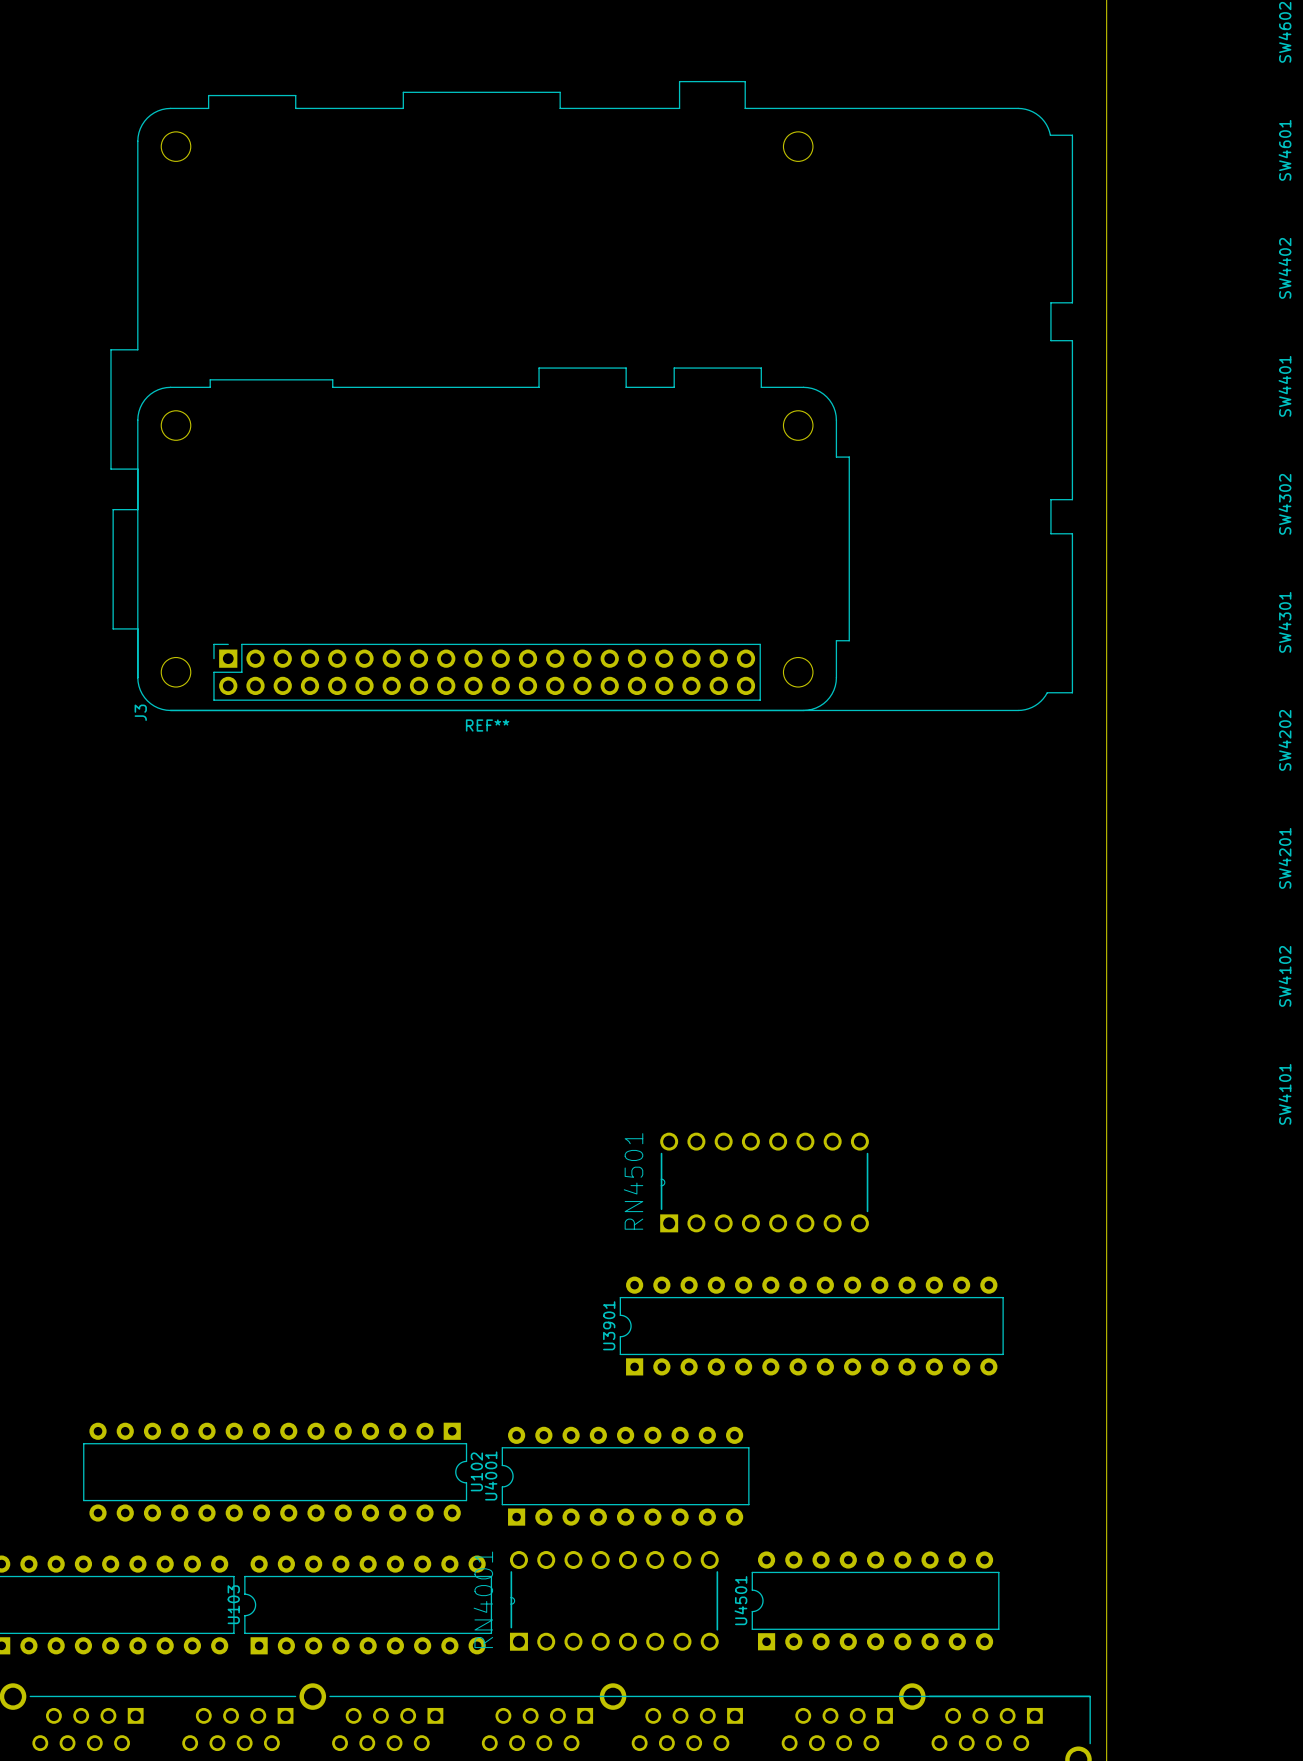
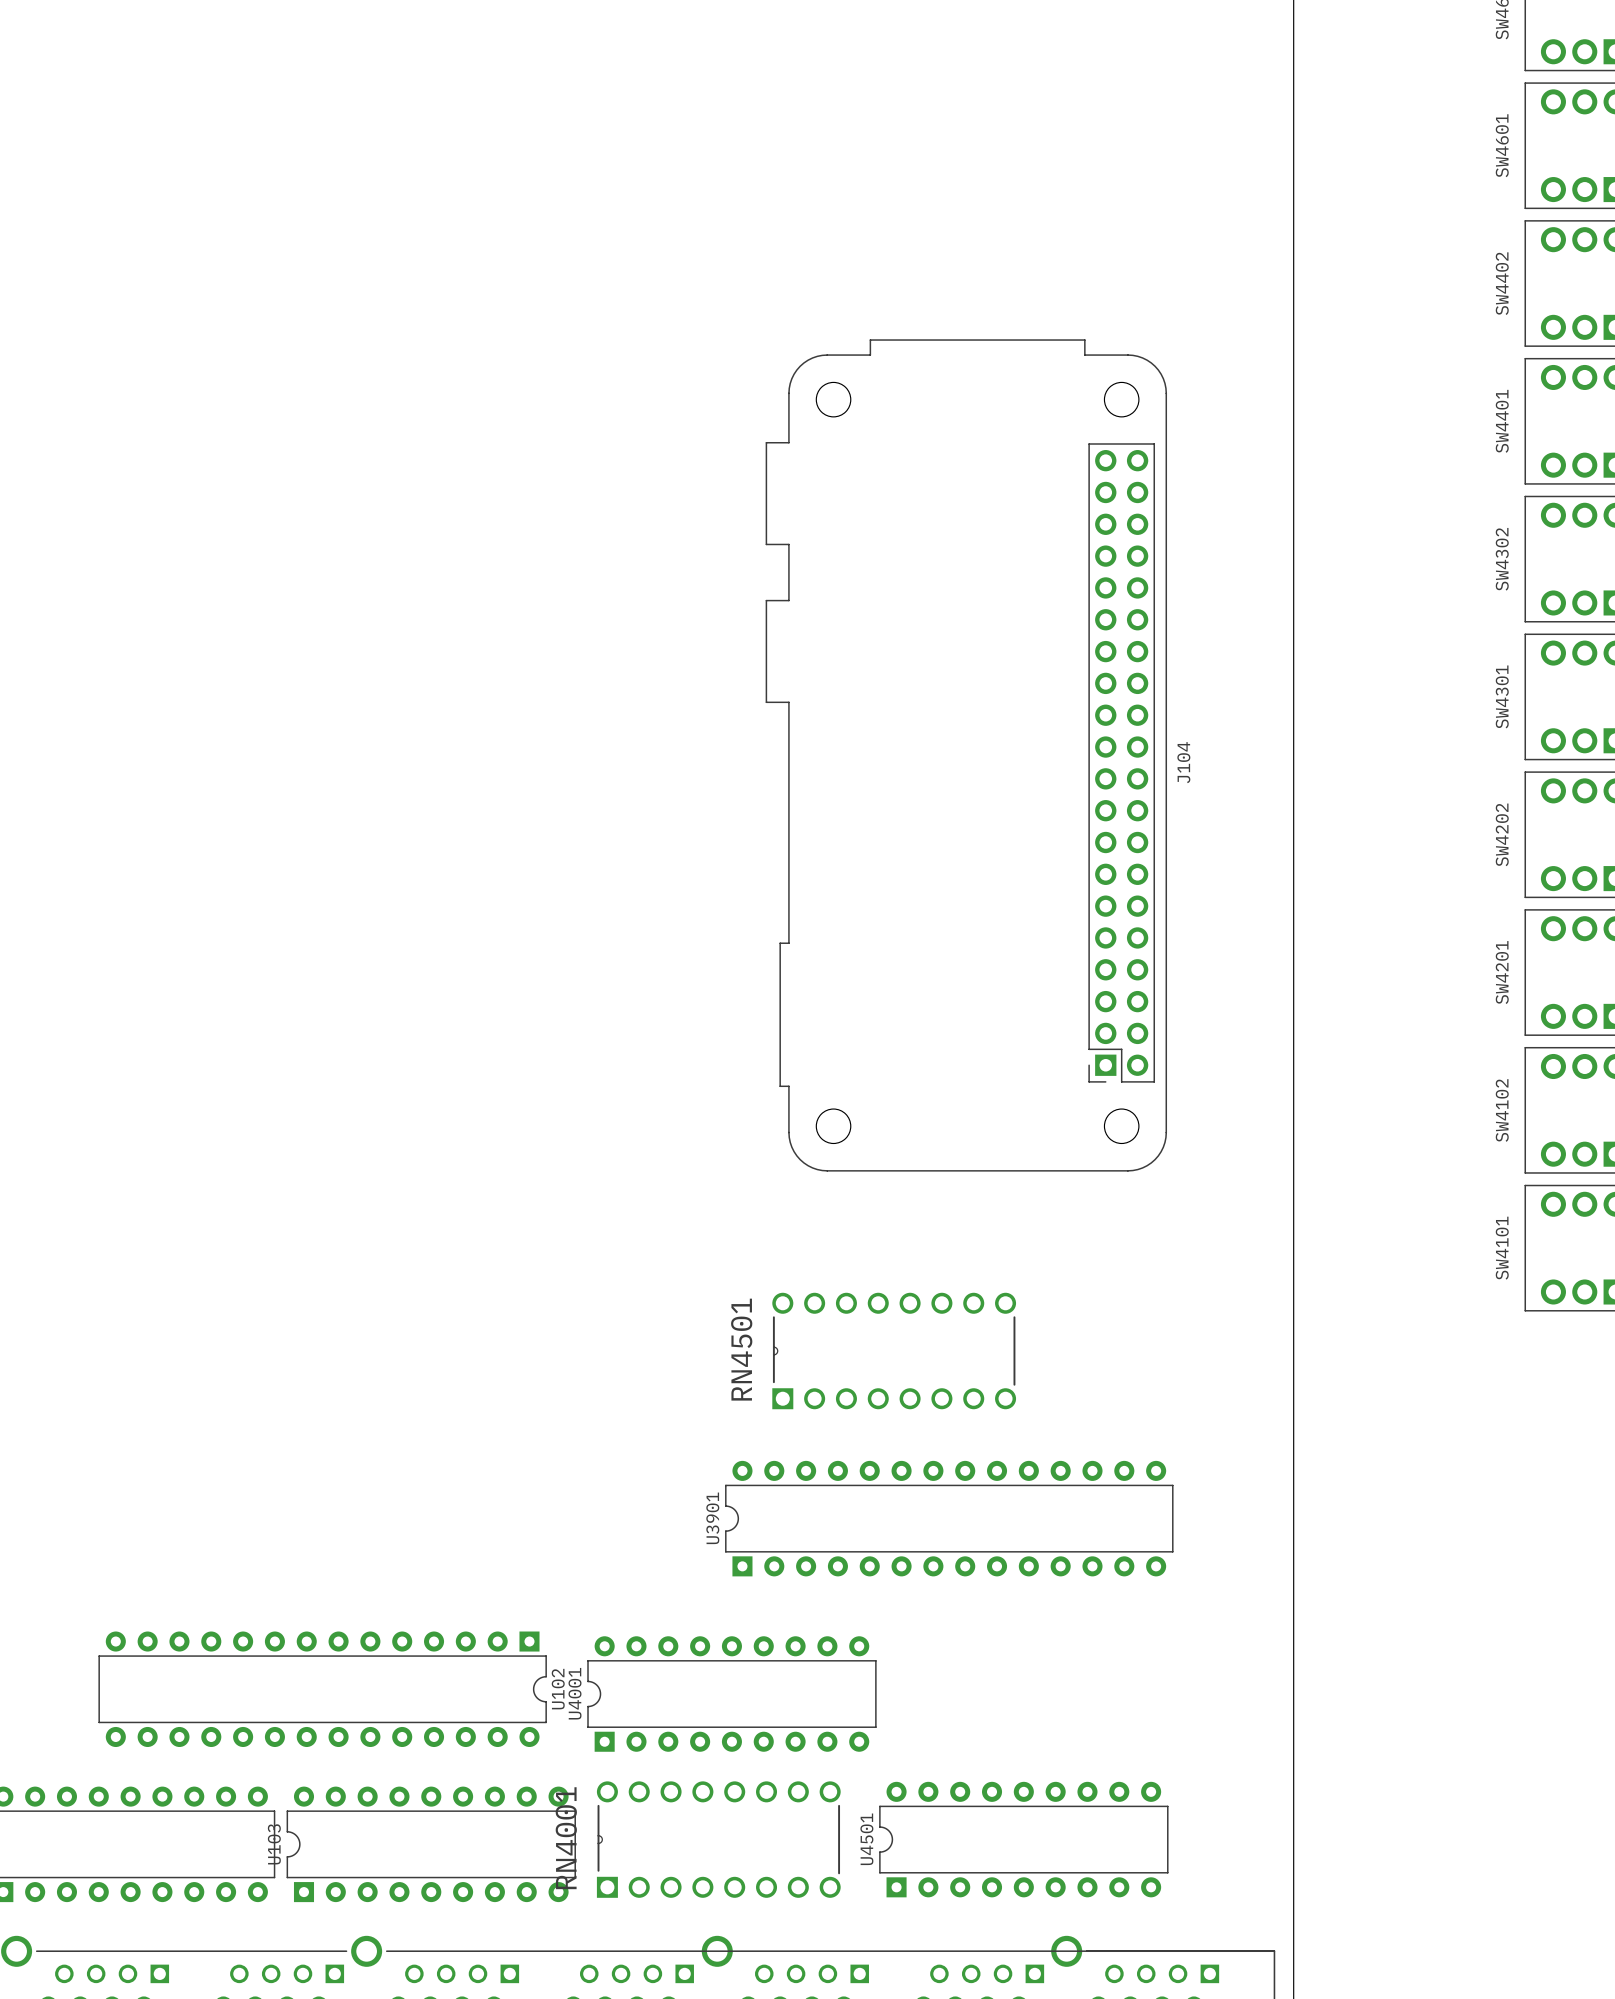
J3: (591, 396) -> none
J104: none -> (966, 755)

